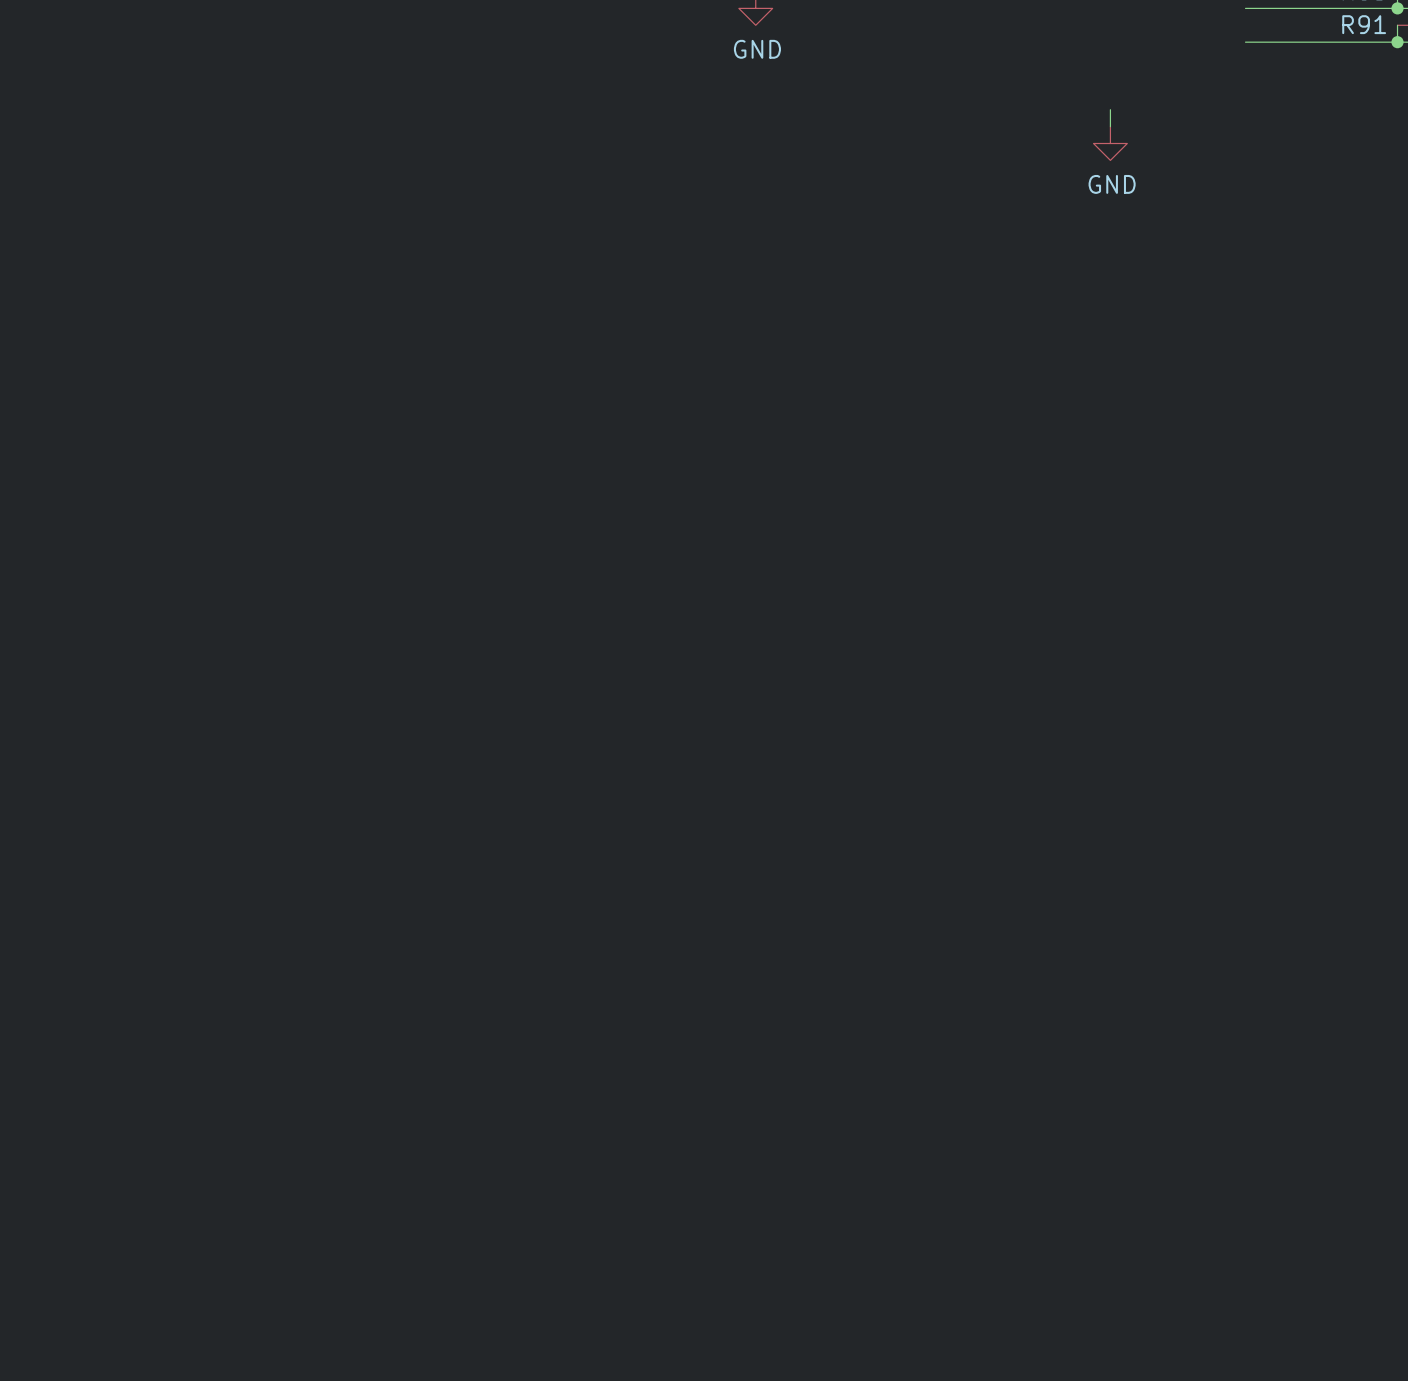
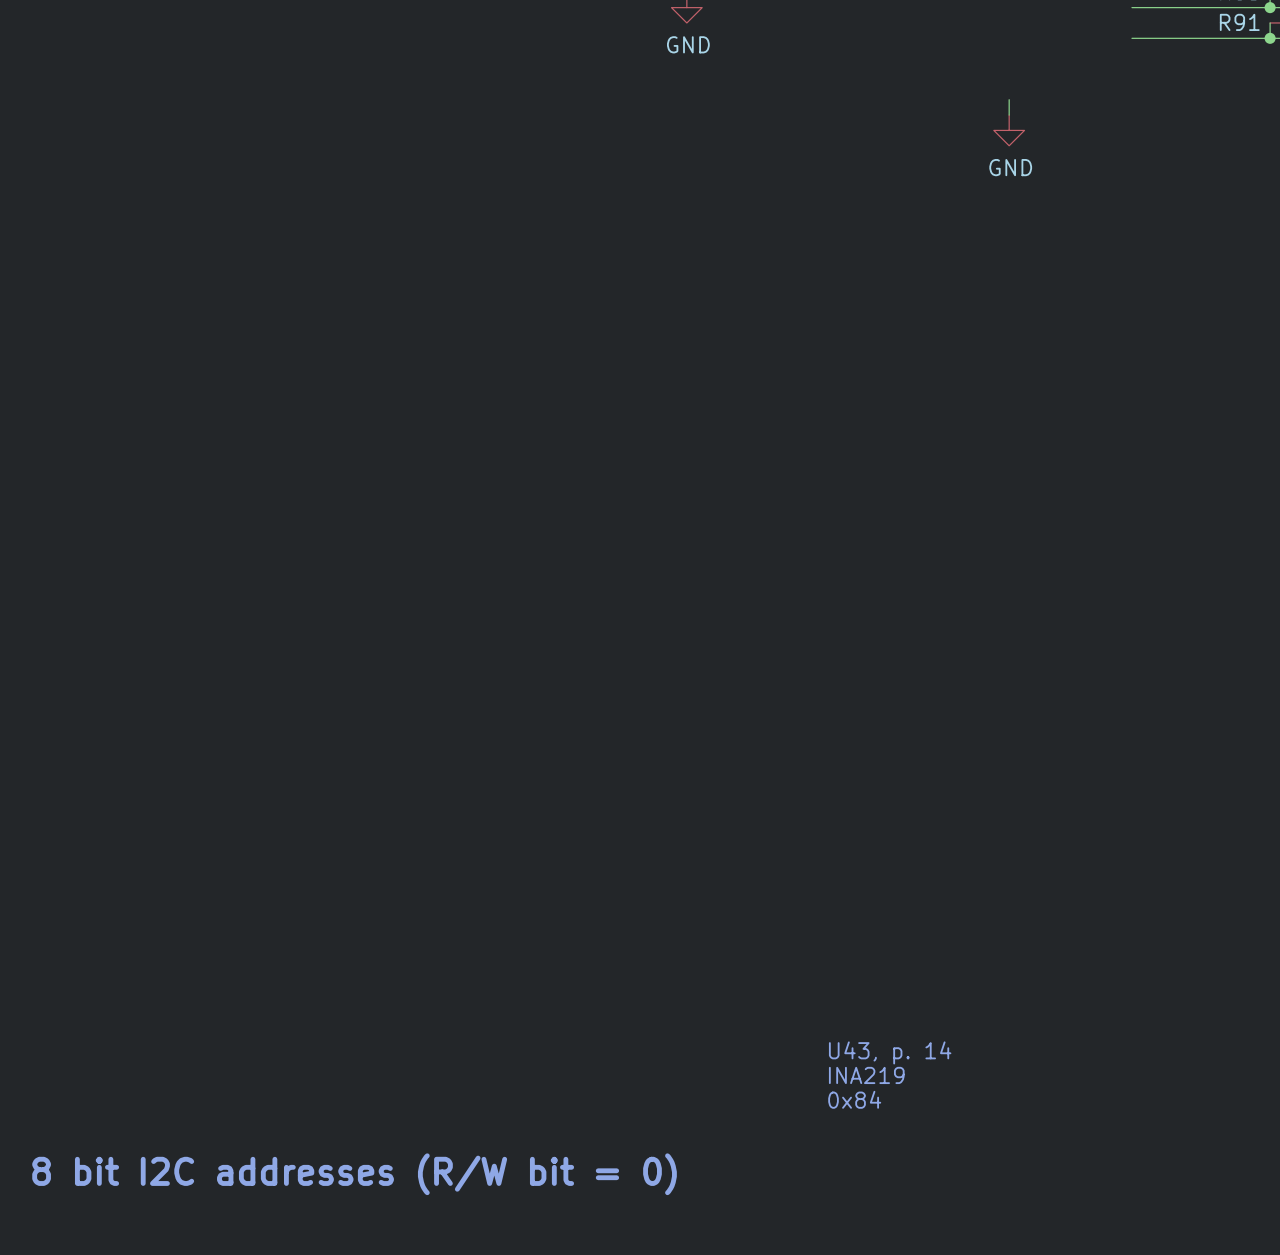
text: none -> U43, p. 14 (890, 1052)
text: none -> INA219 (866, 1075)
text: none -> 0x84 (854, 1099)
text: none -> 8 bit I2C addresses (R/W bit = 0) (354, 1174)

